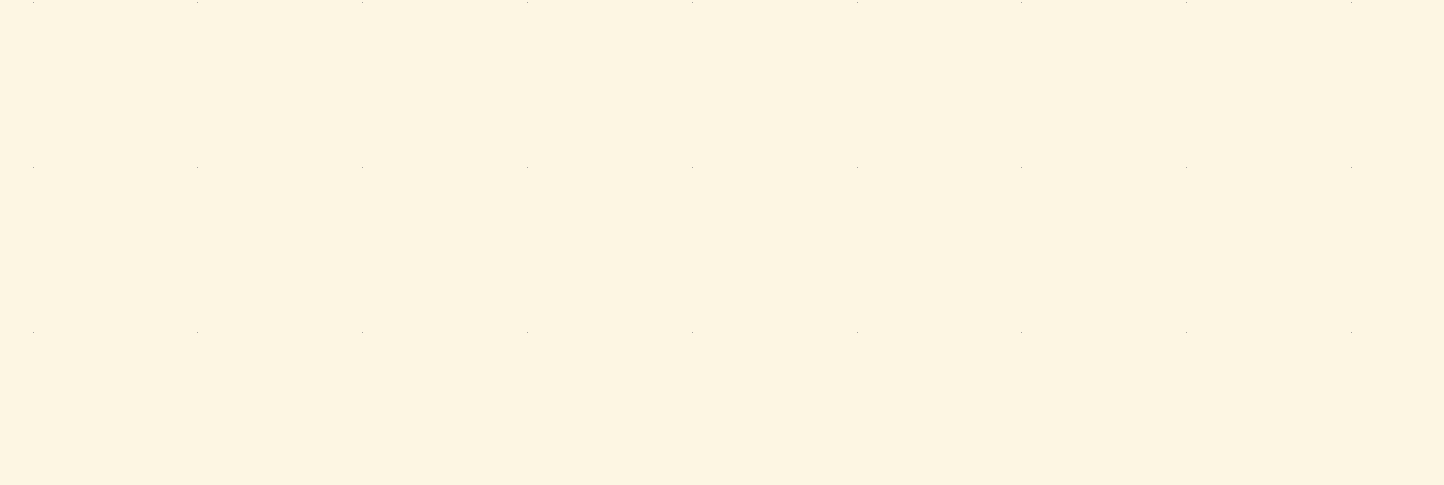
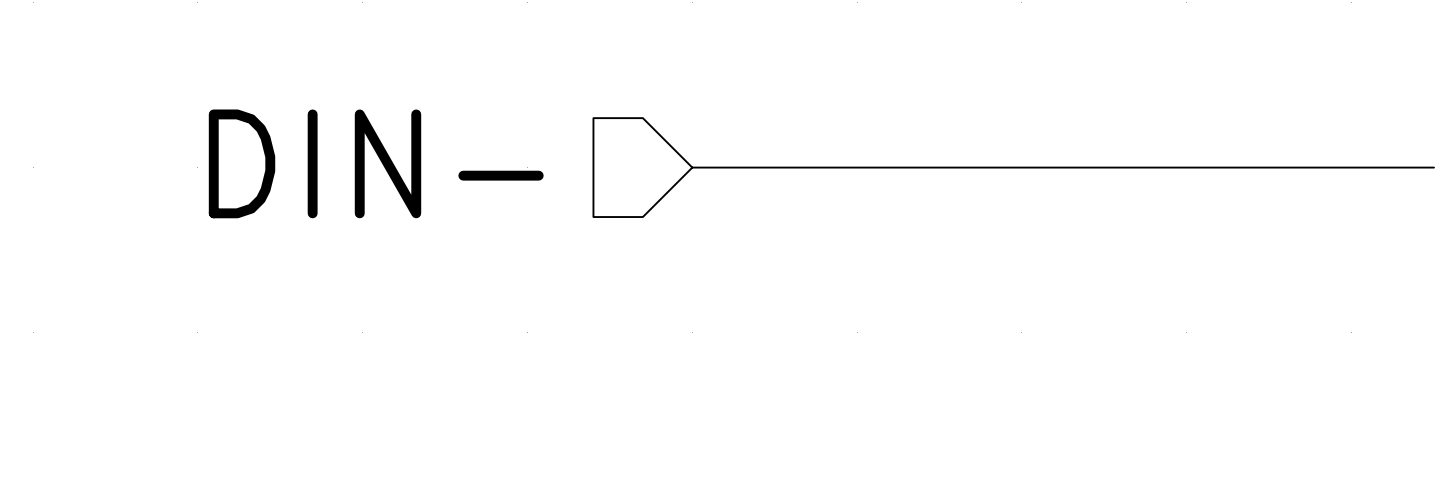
hierarchical label: none -> DIN- (376, 163)
wire: none -> (692, 167) (1434, 167)

